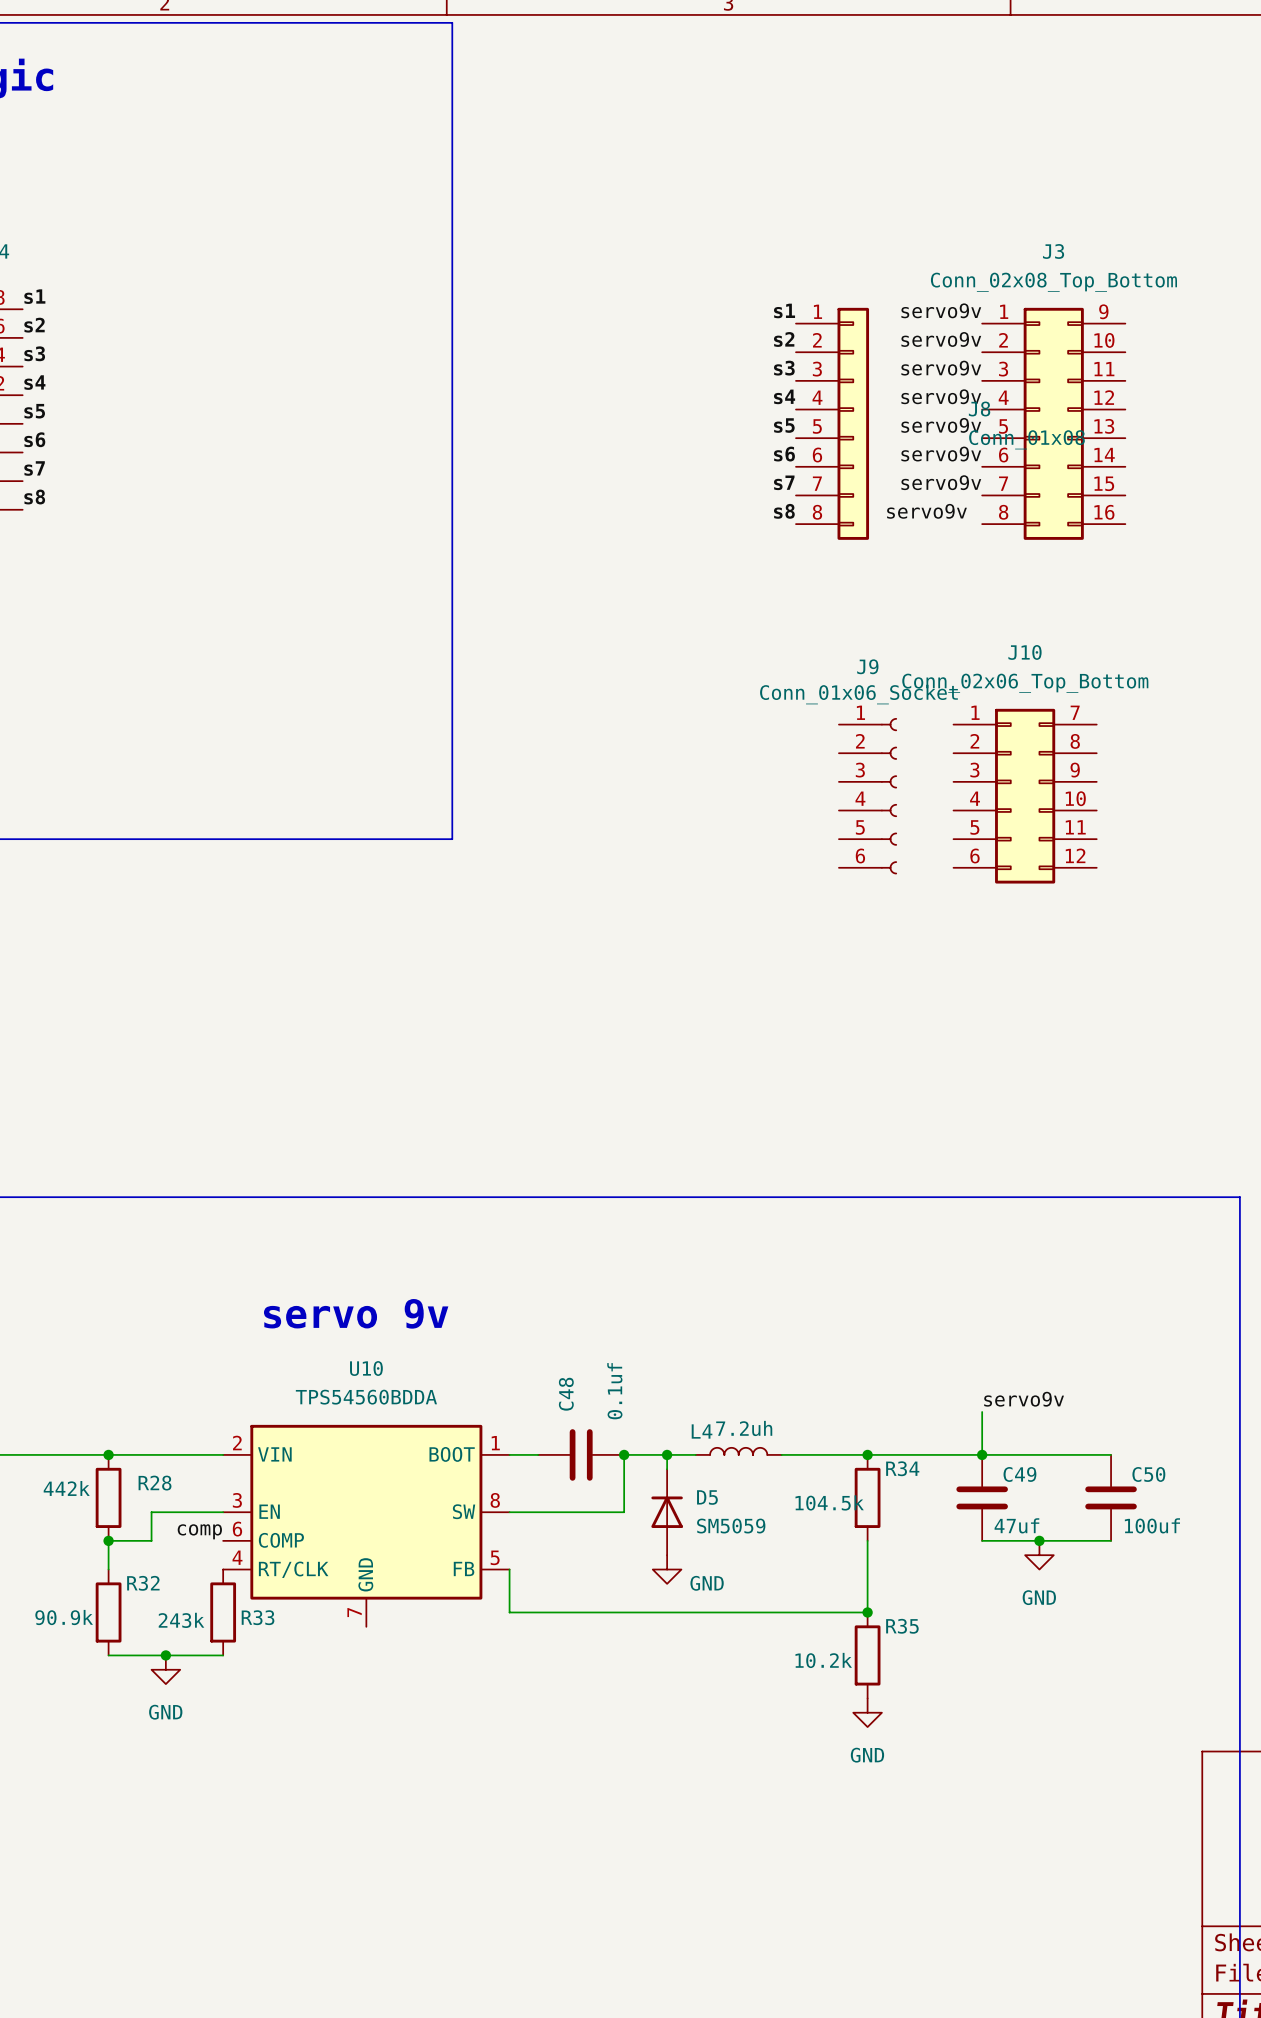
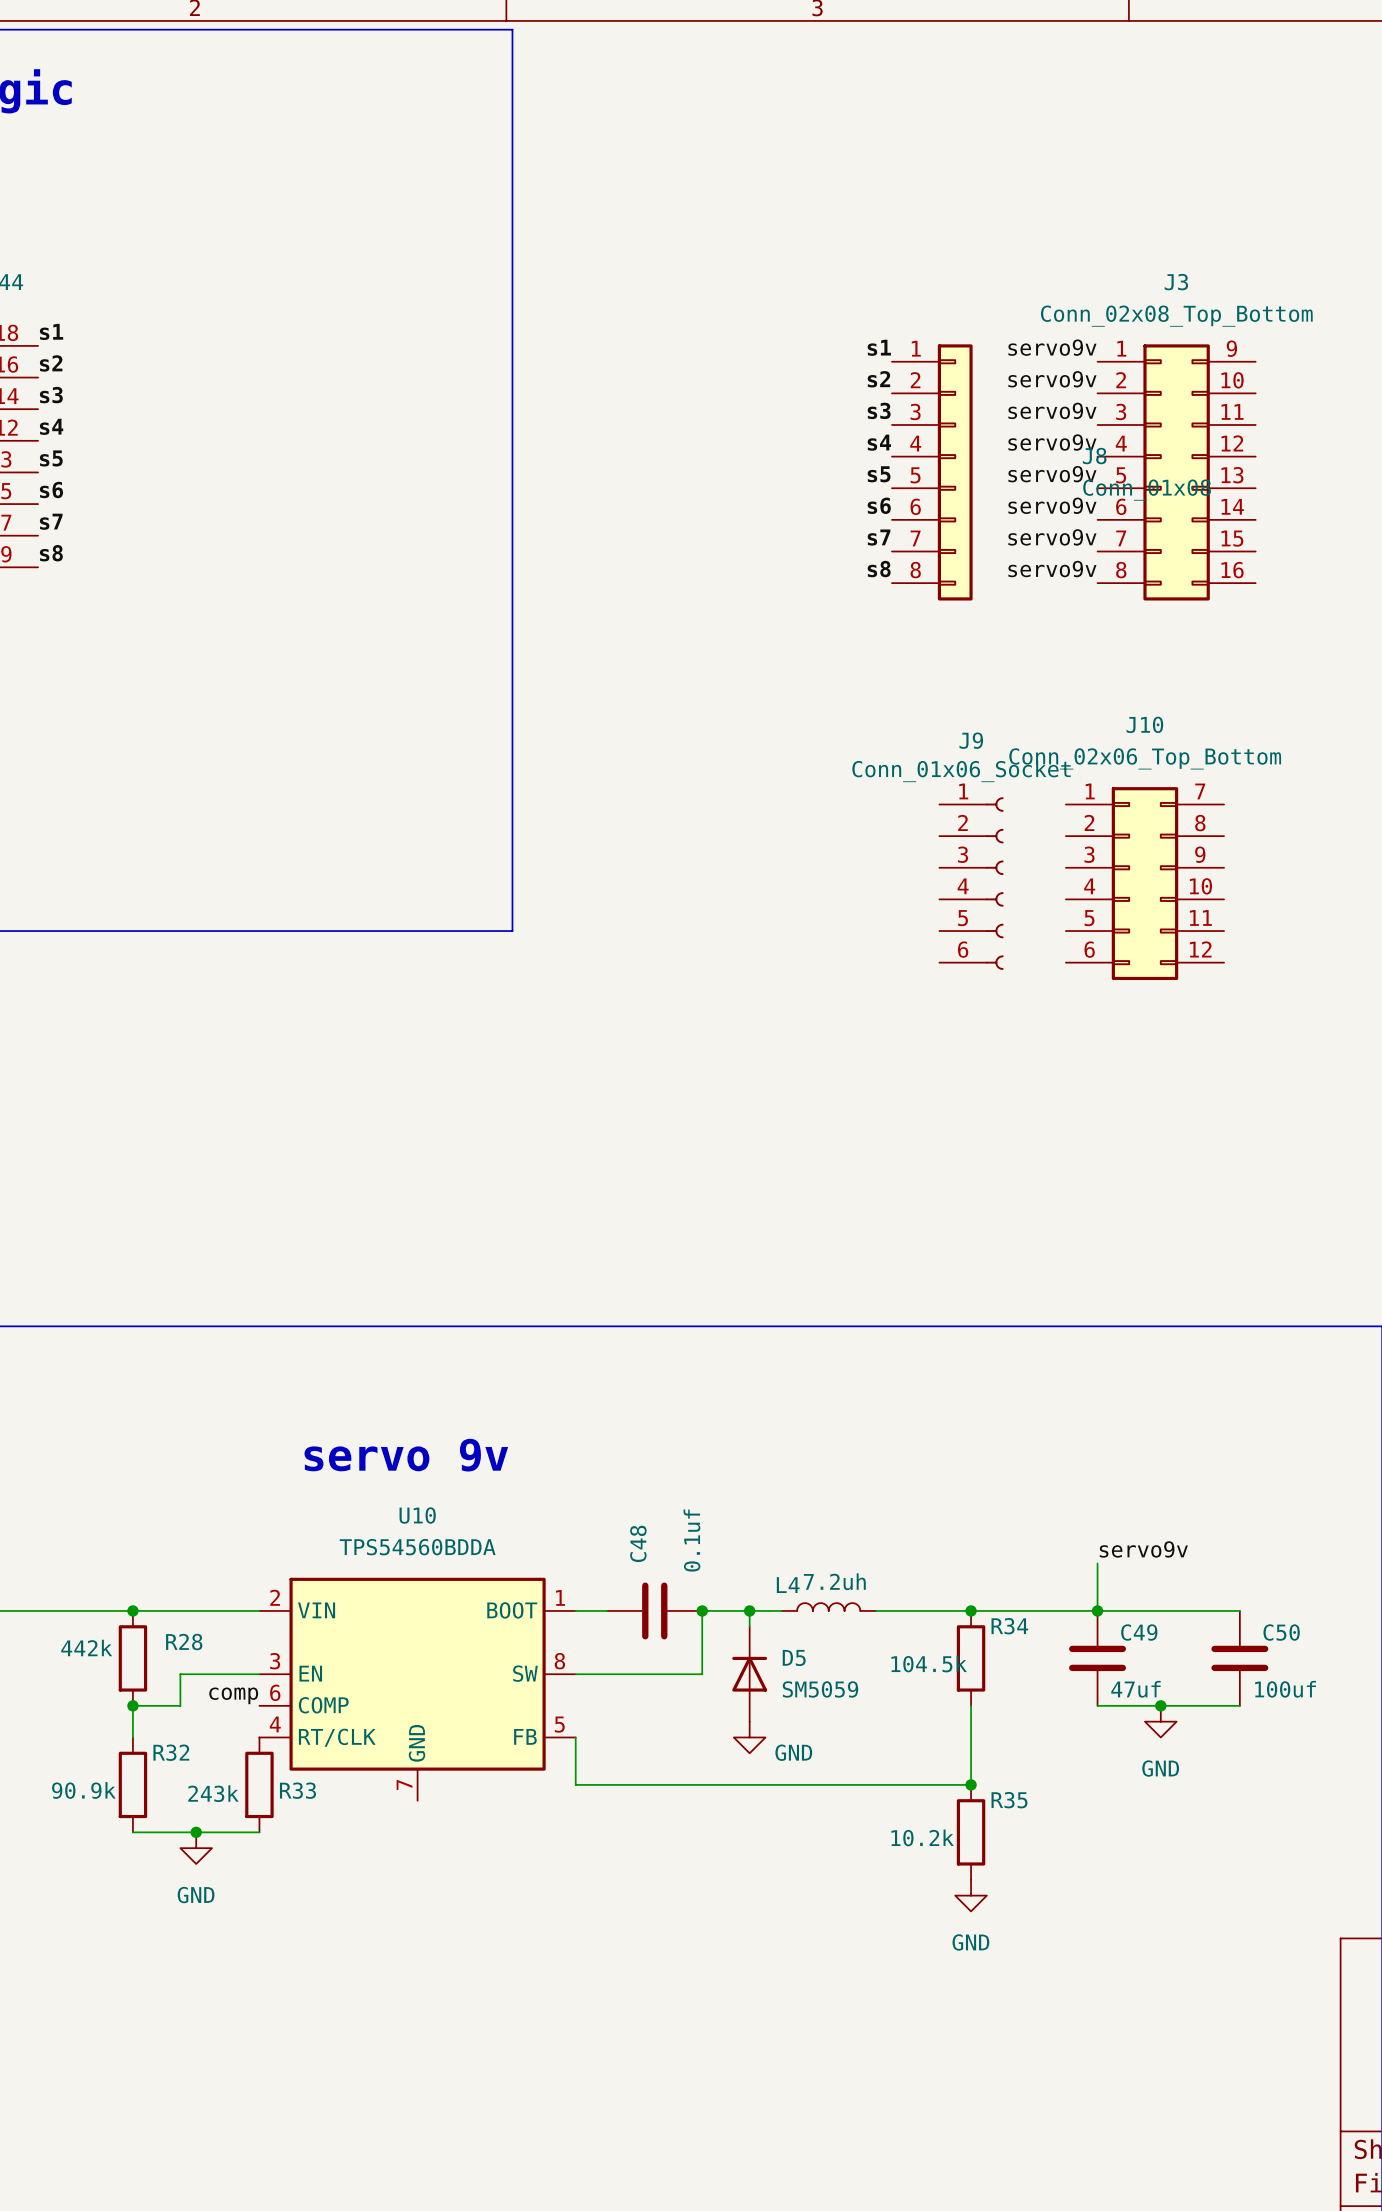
label position: servo9v (926, 511) -> servo9v (1052, 569)

